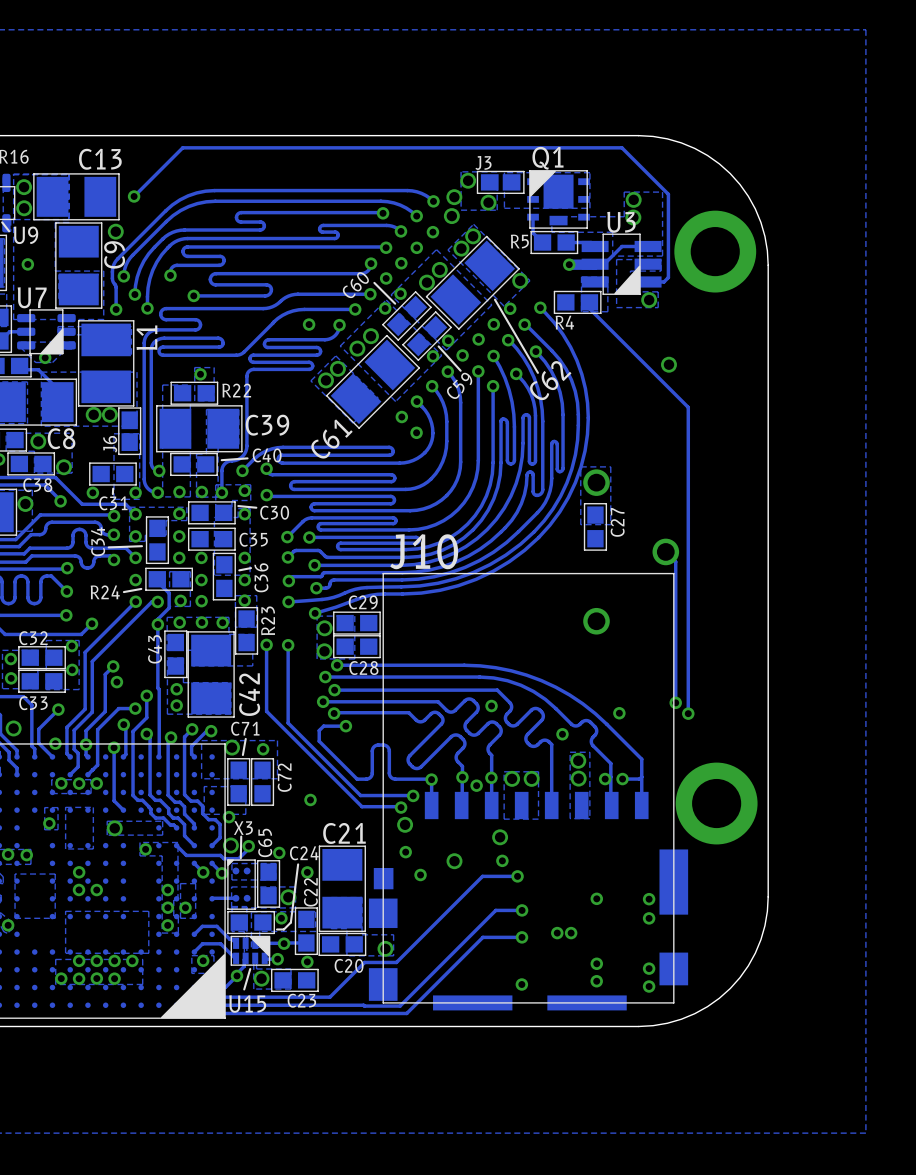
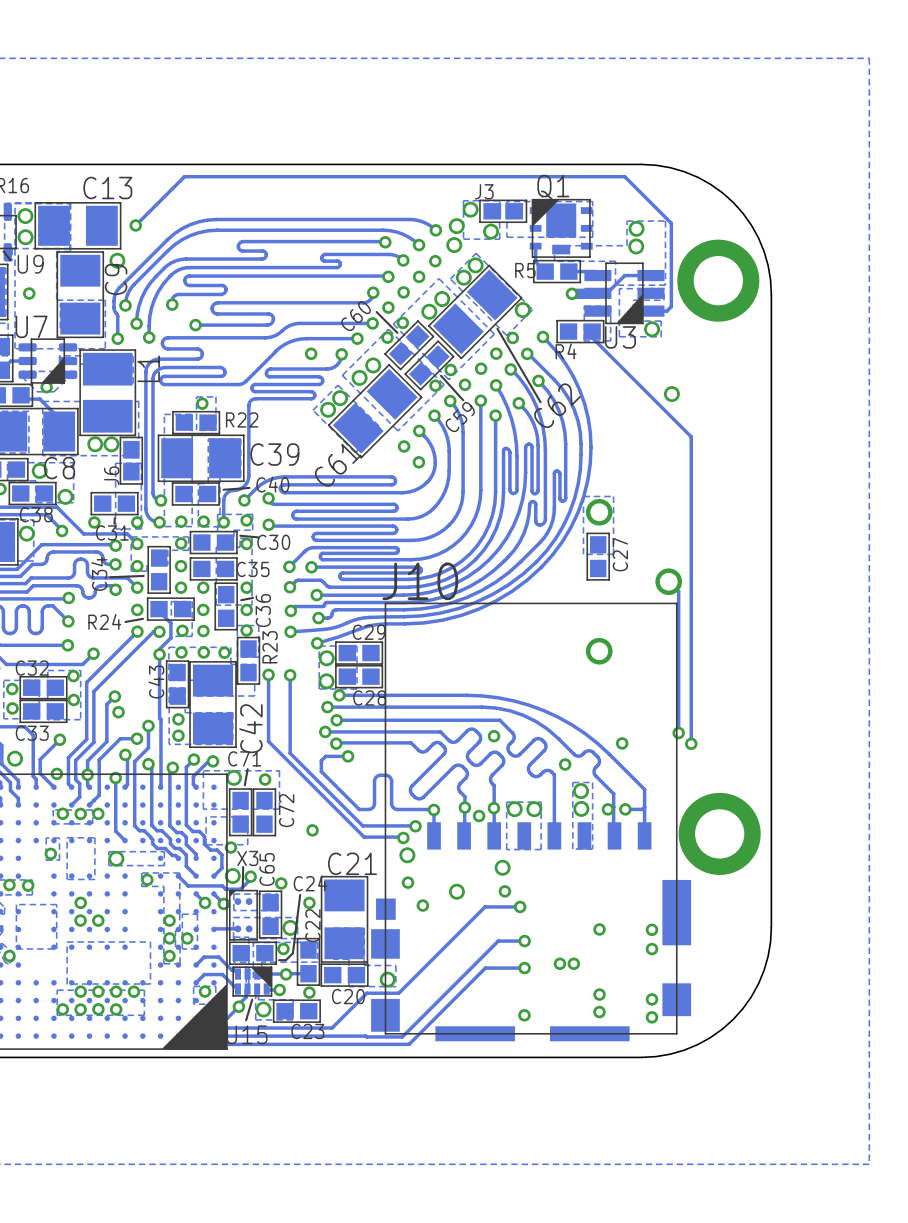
U3 name position: U3 (621, 222) -> U3 (620, 337)

